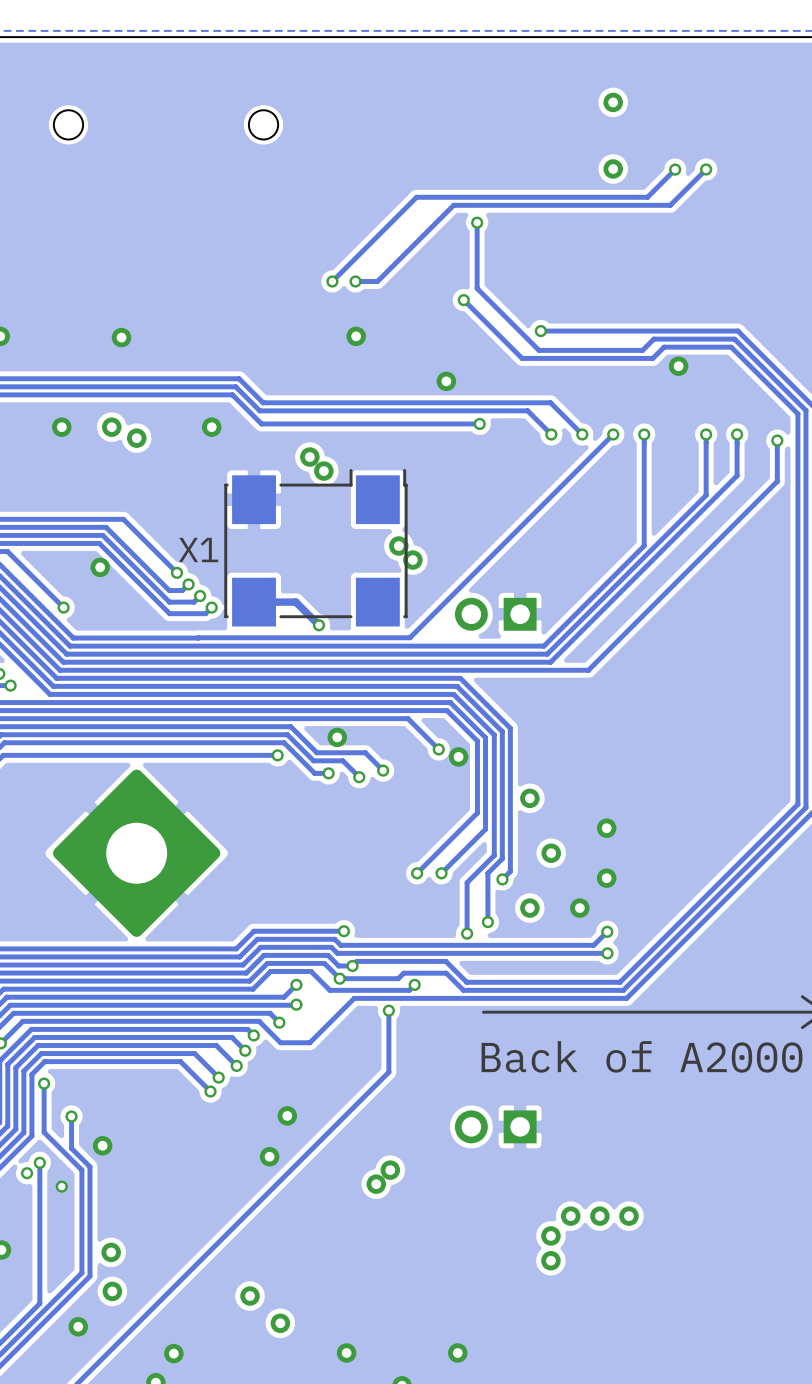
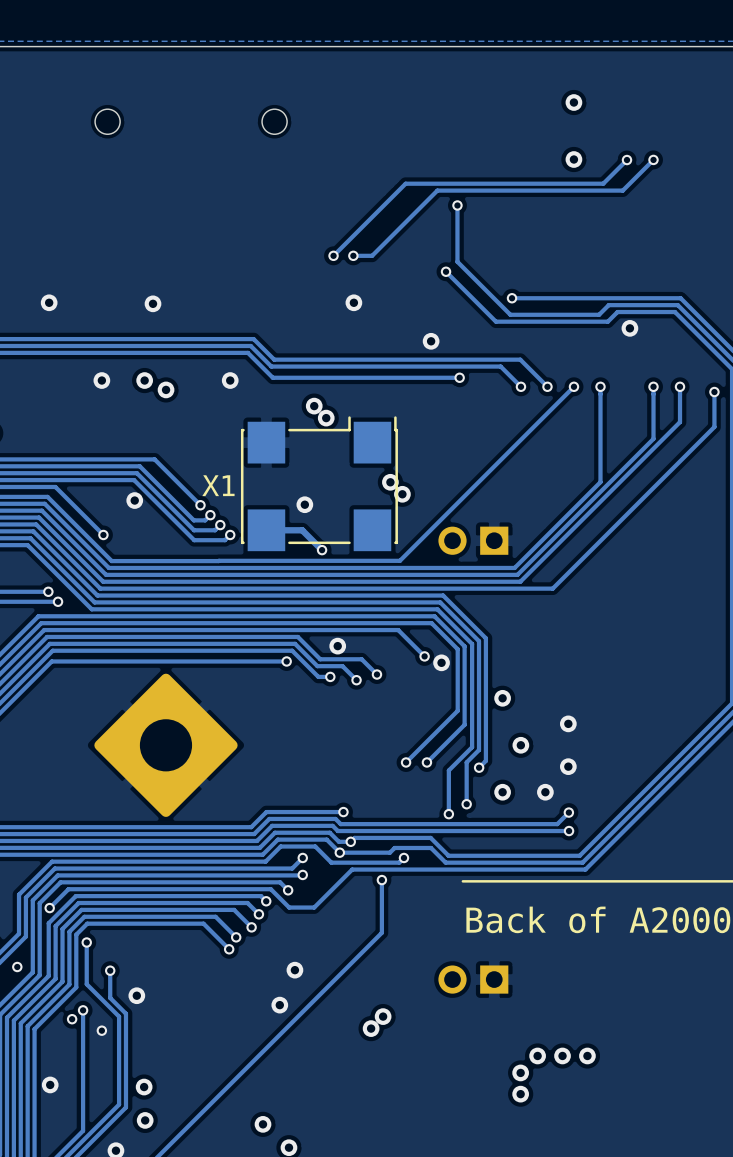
via: none -> (304, 504)

